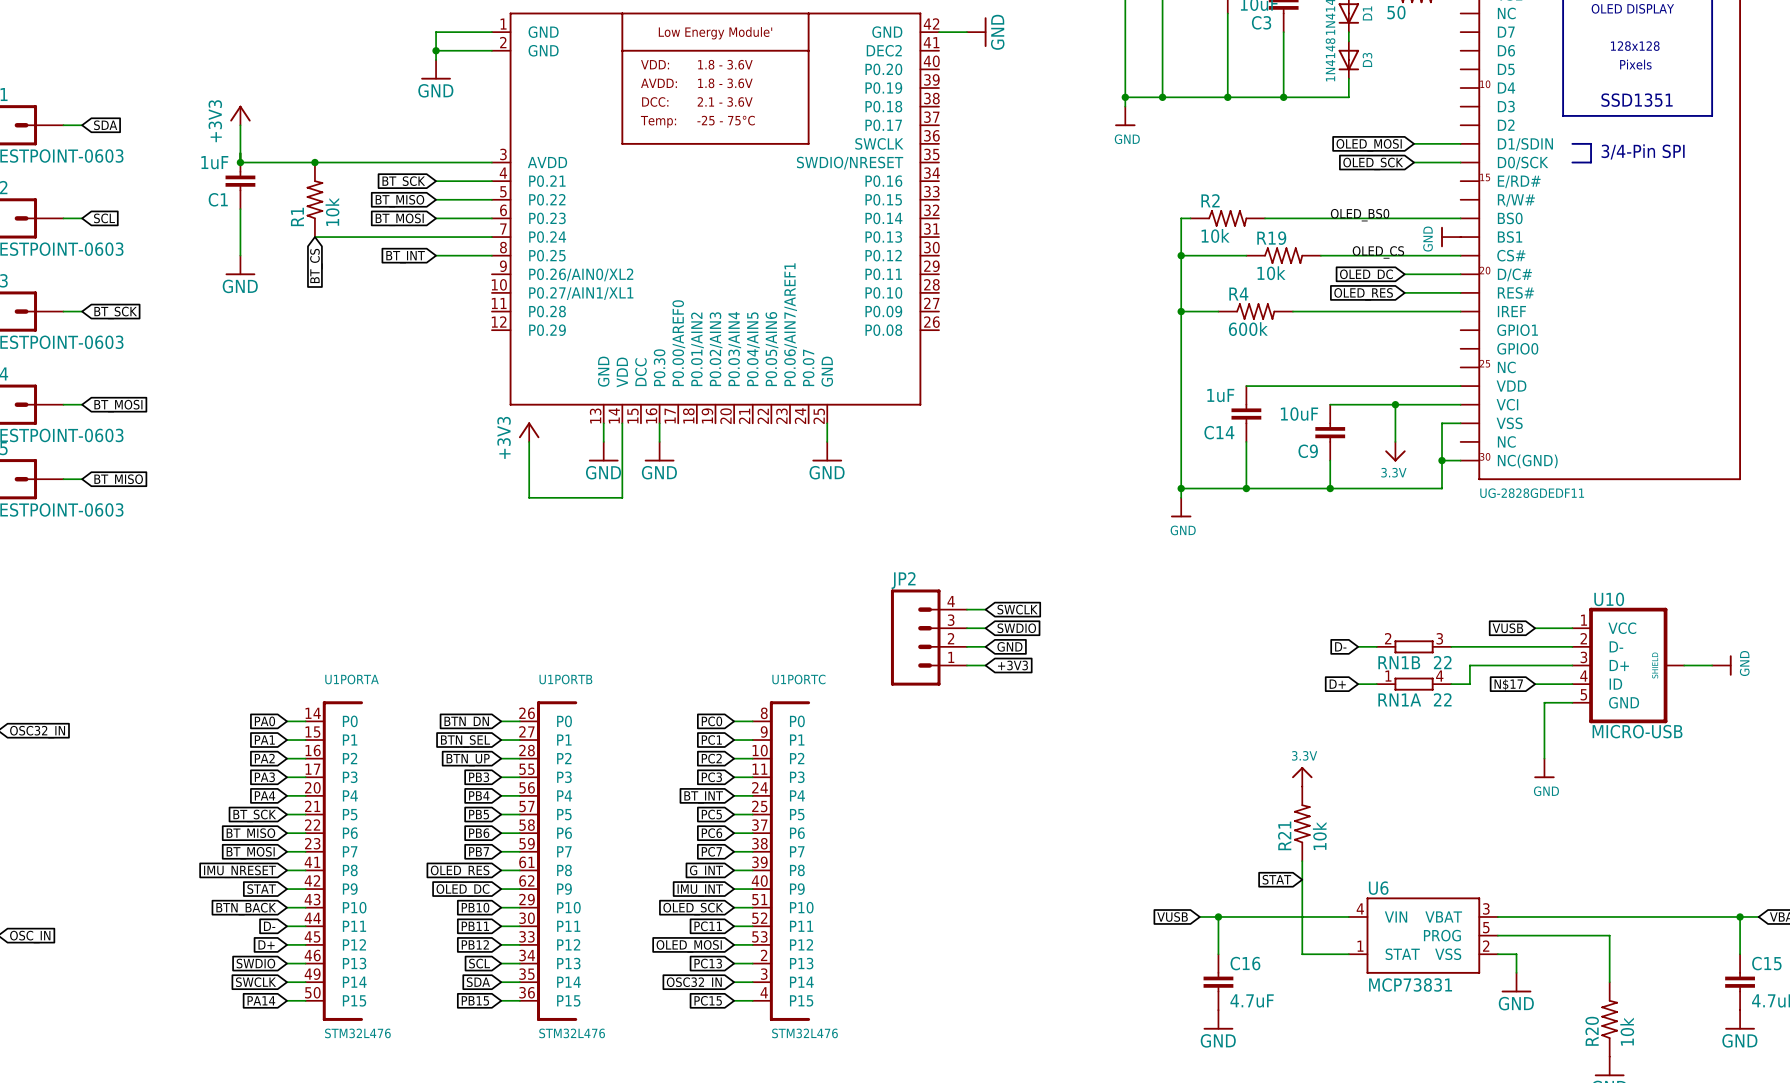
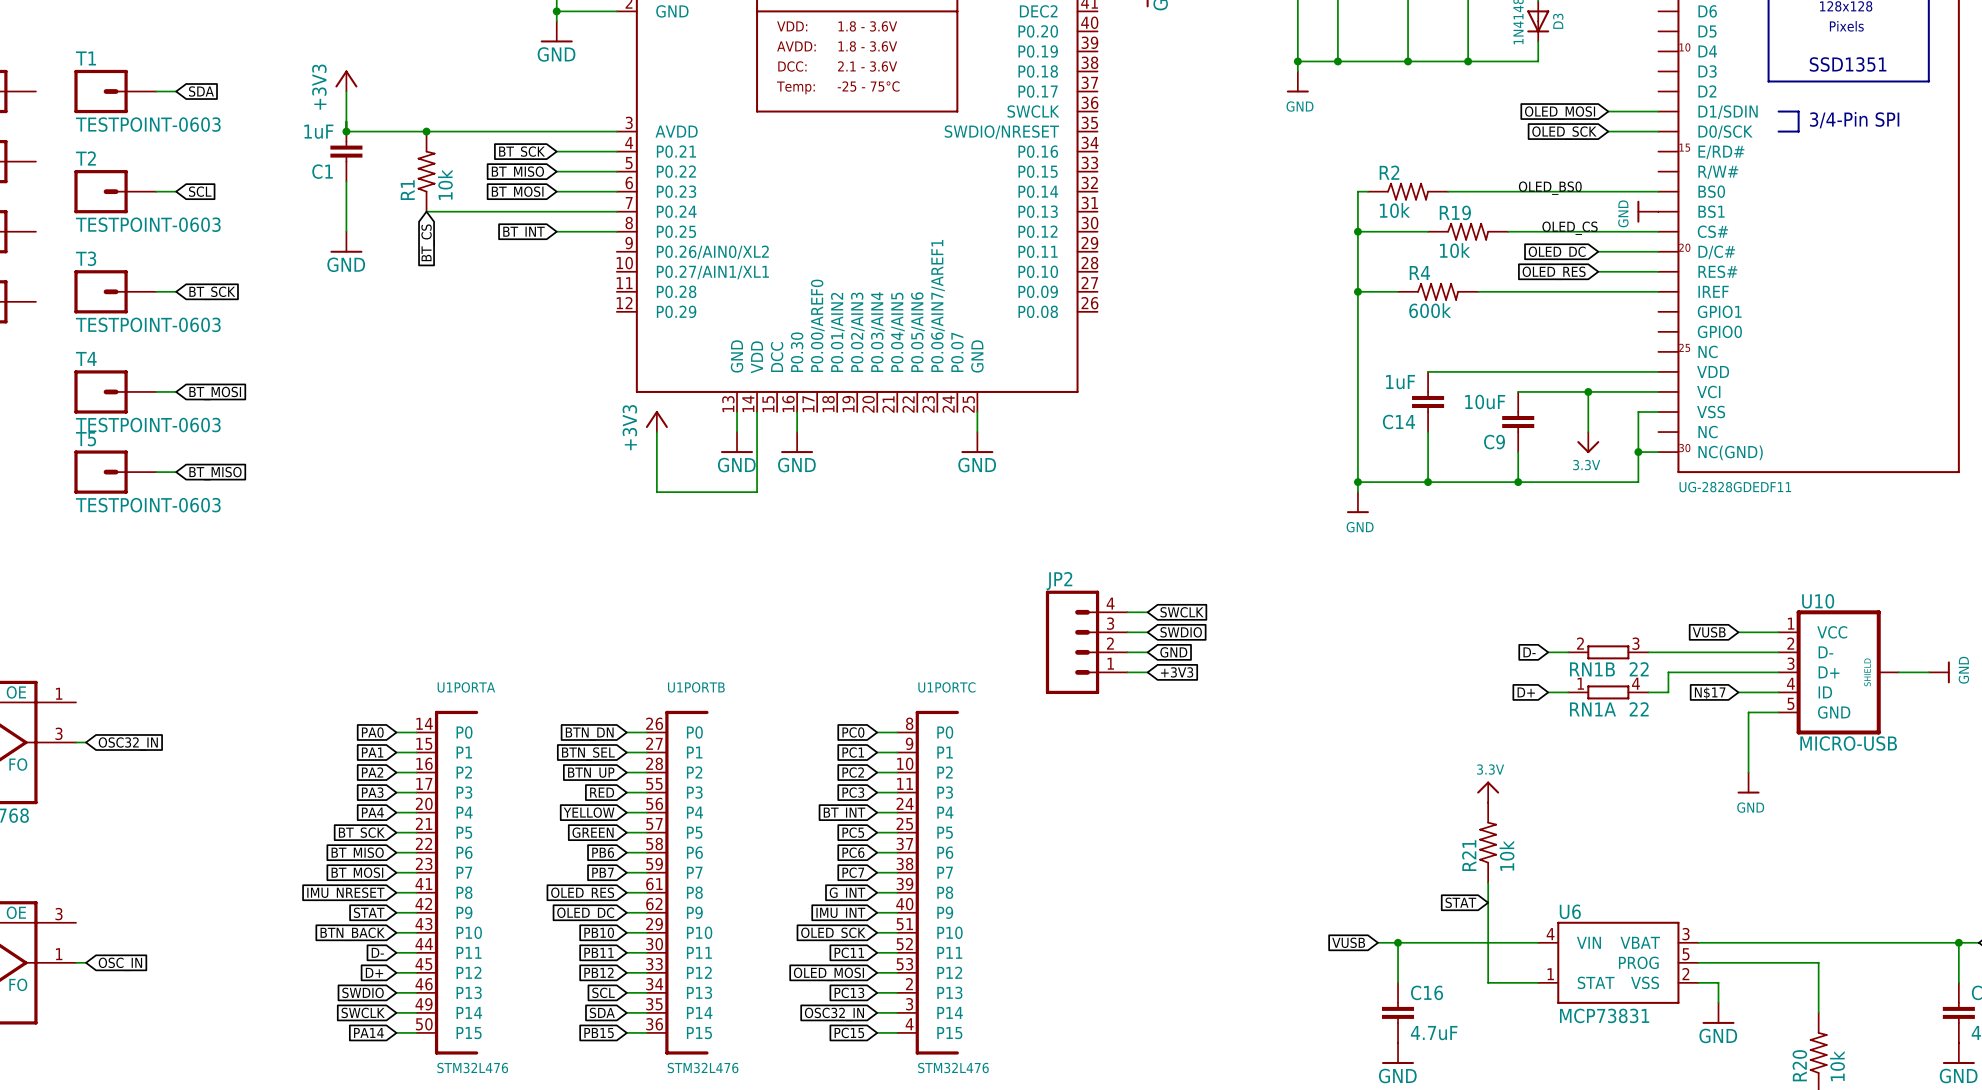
global label: PB3 (479, 777) -> RED (602, 792)
global label: PB4 (479, 795) -> YELLOW (589, 812)
global label: PB5 (479, 814) -> GREEN (593, 832)

